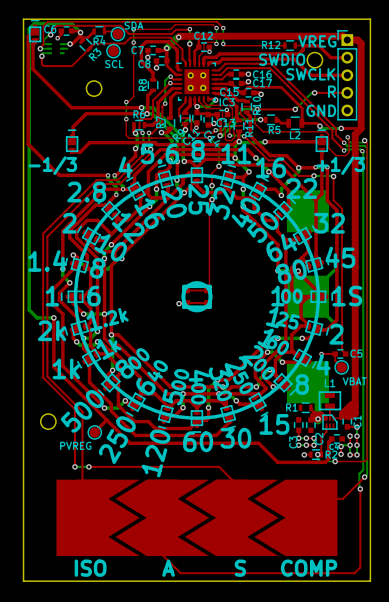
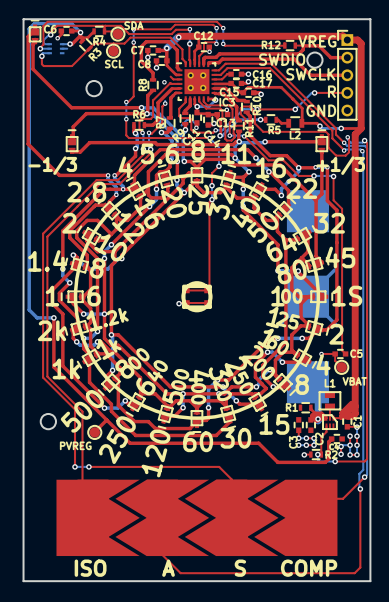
via: (170, 76) -> none
bottom track: (170, 77) (169, 76) (165, 80) (165, 100) -> none
via: none -> (164, 82)
via: (170, 83) -> none

